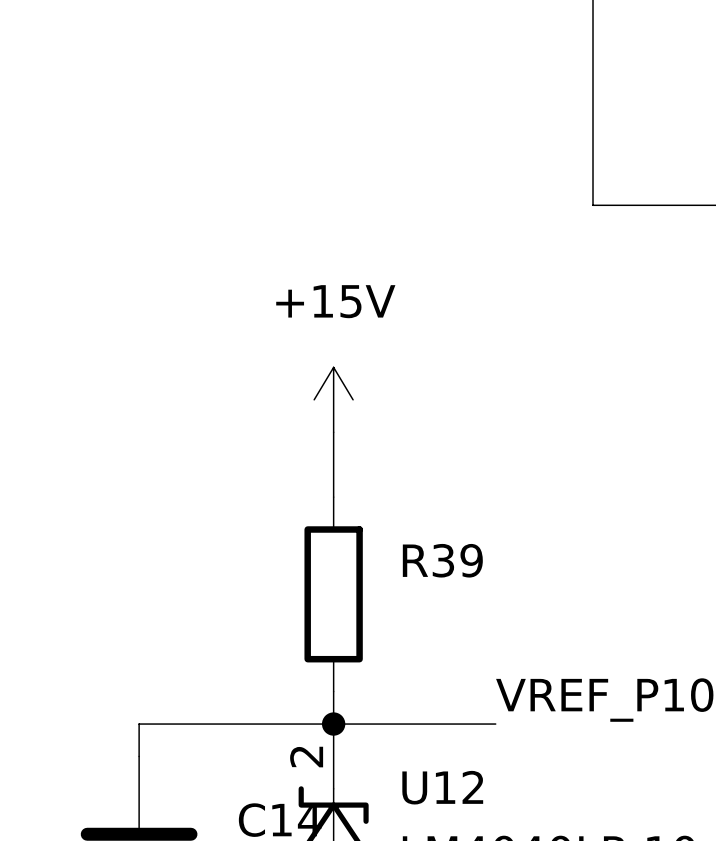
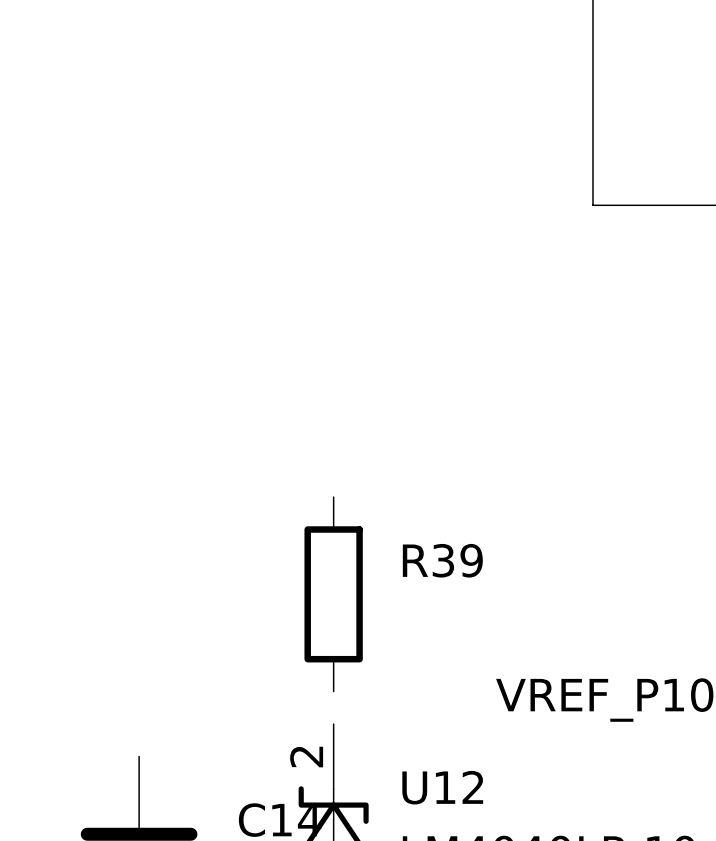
power symbol: +15V (333, 399) -> none
wire: (333, 432) (333, 497) -> none
wire: (333, 691) (333, 724) -> none
junction: (333, 724) -> none
wire: (495, 724) (139, 724) (139, 756) -> none

